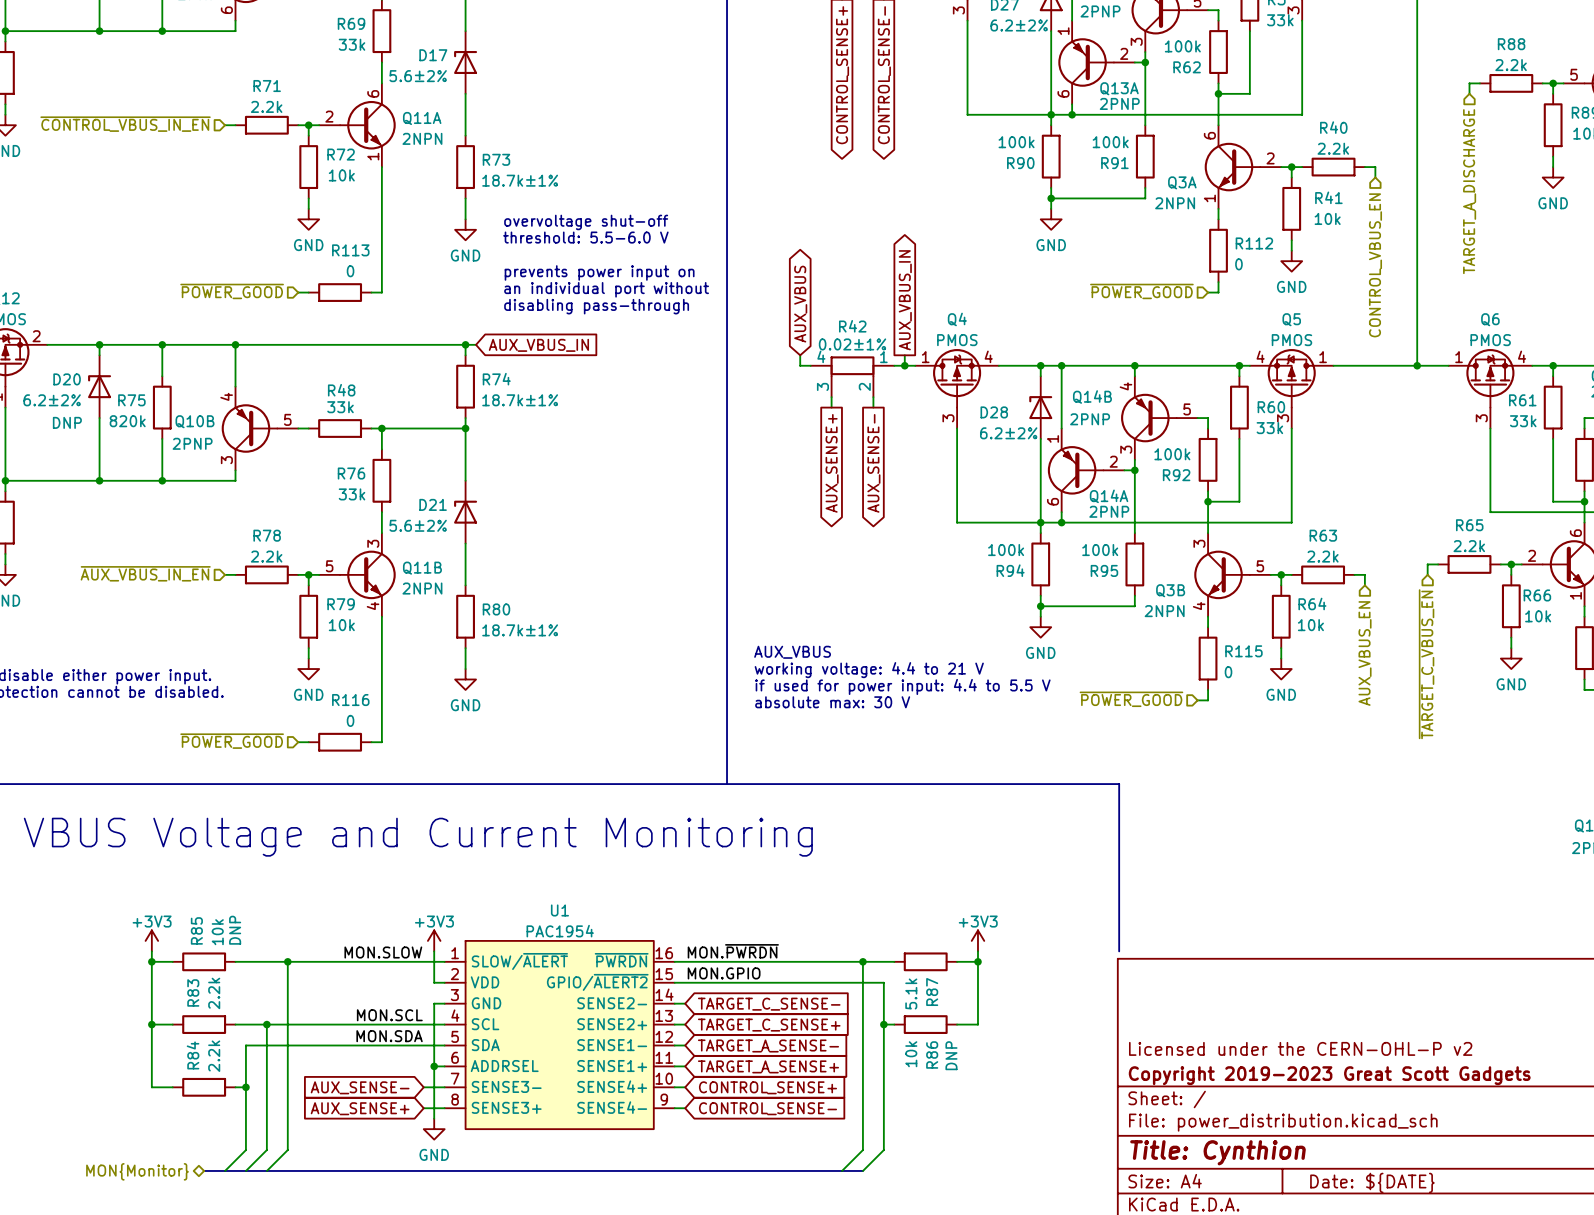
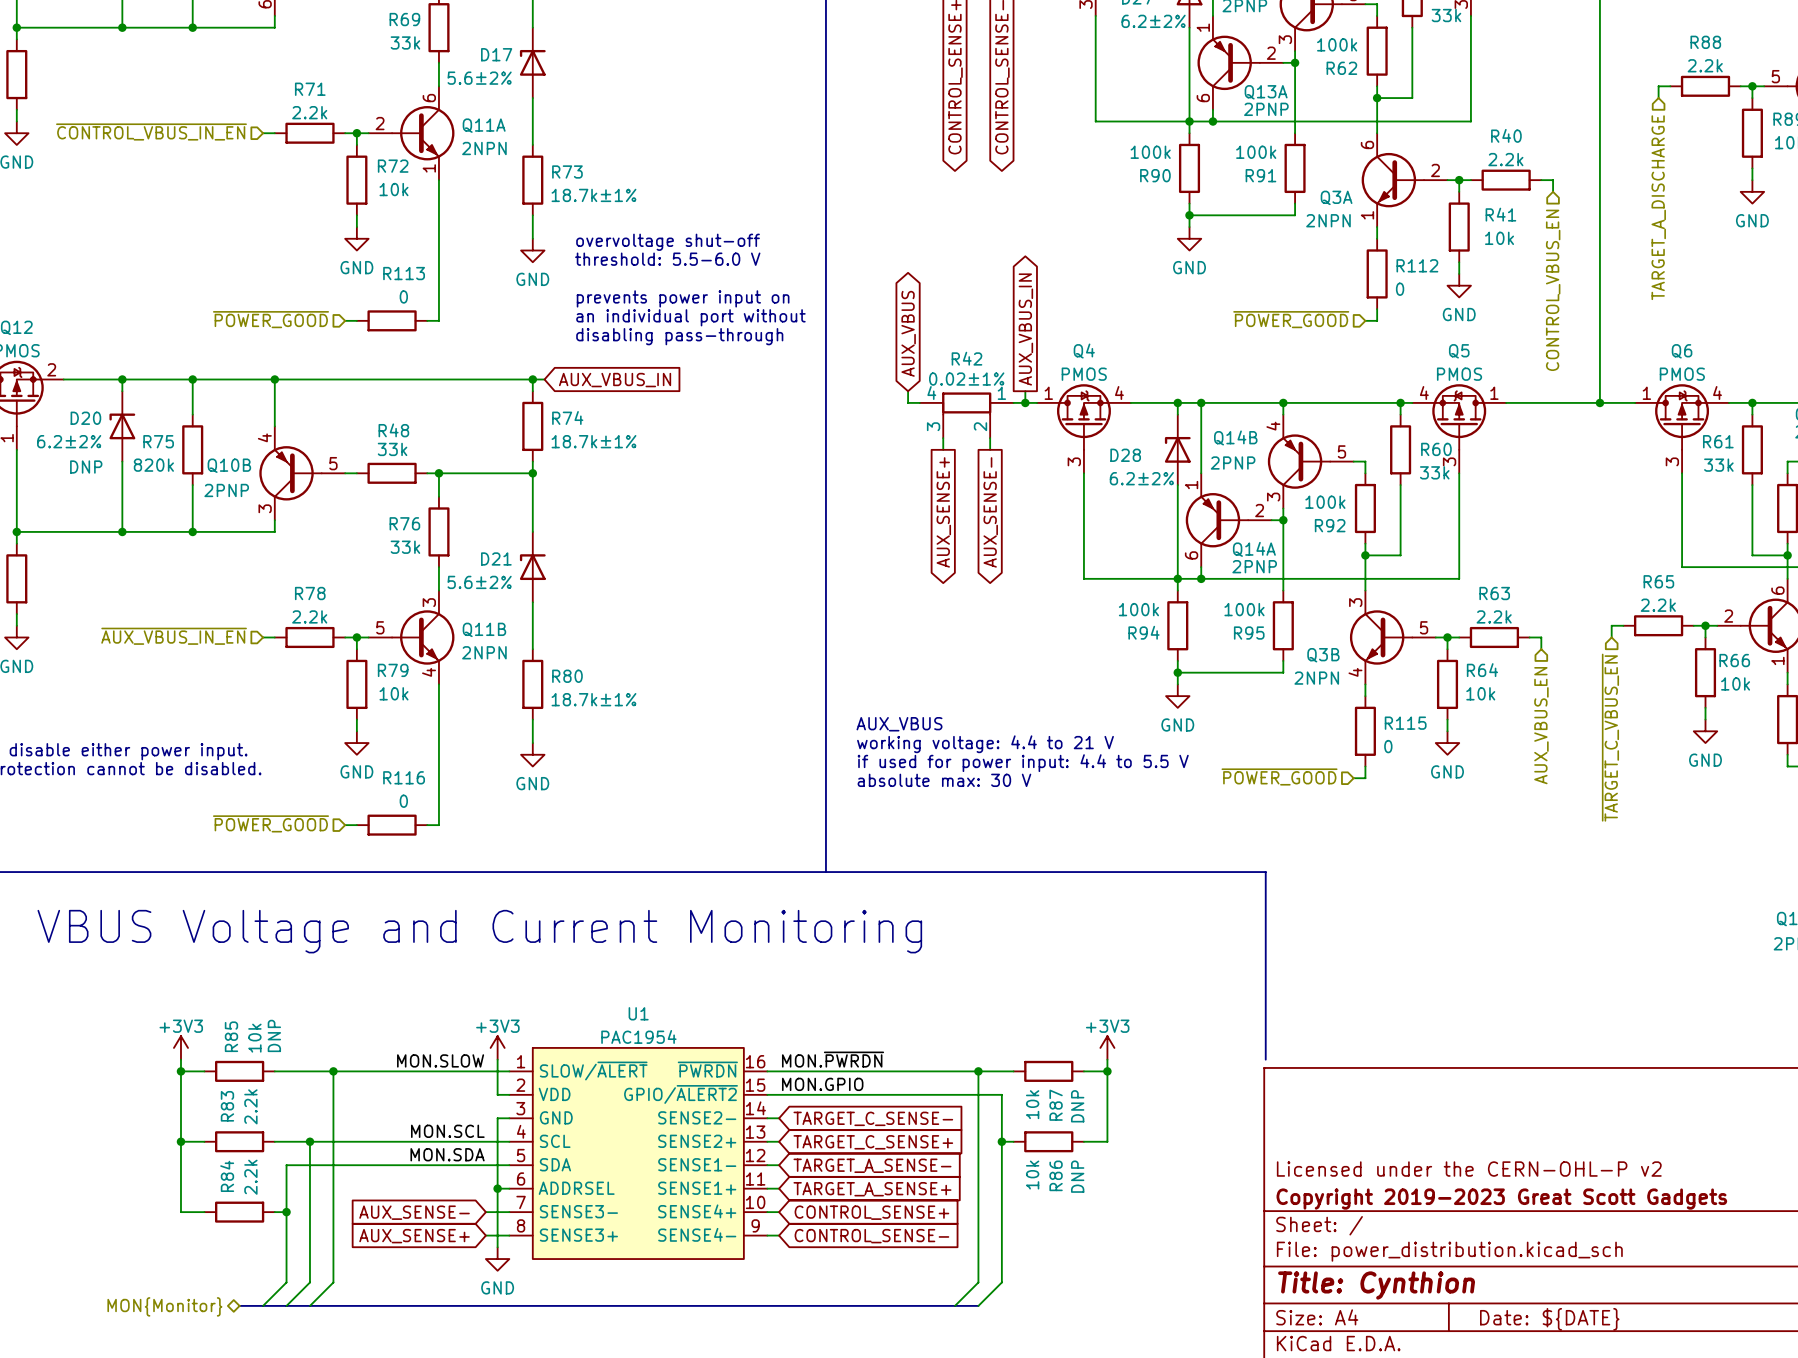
R87 text: none -> DNP (1077, 1106)
R87 value: 5.1k (911, 993) -> 10k (1032, 1104)

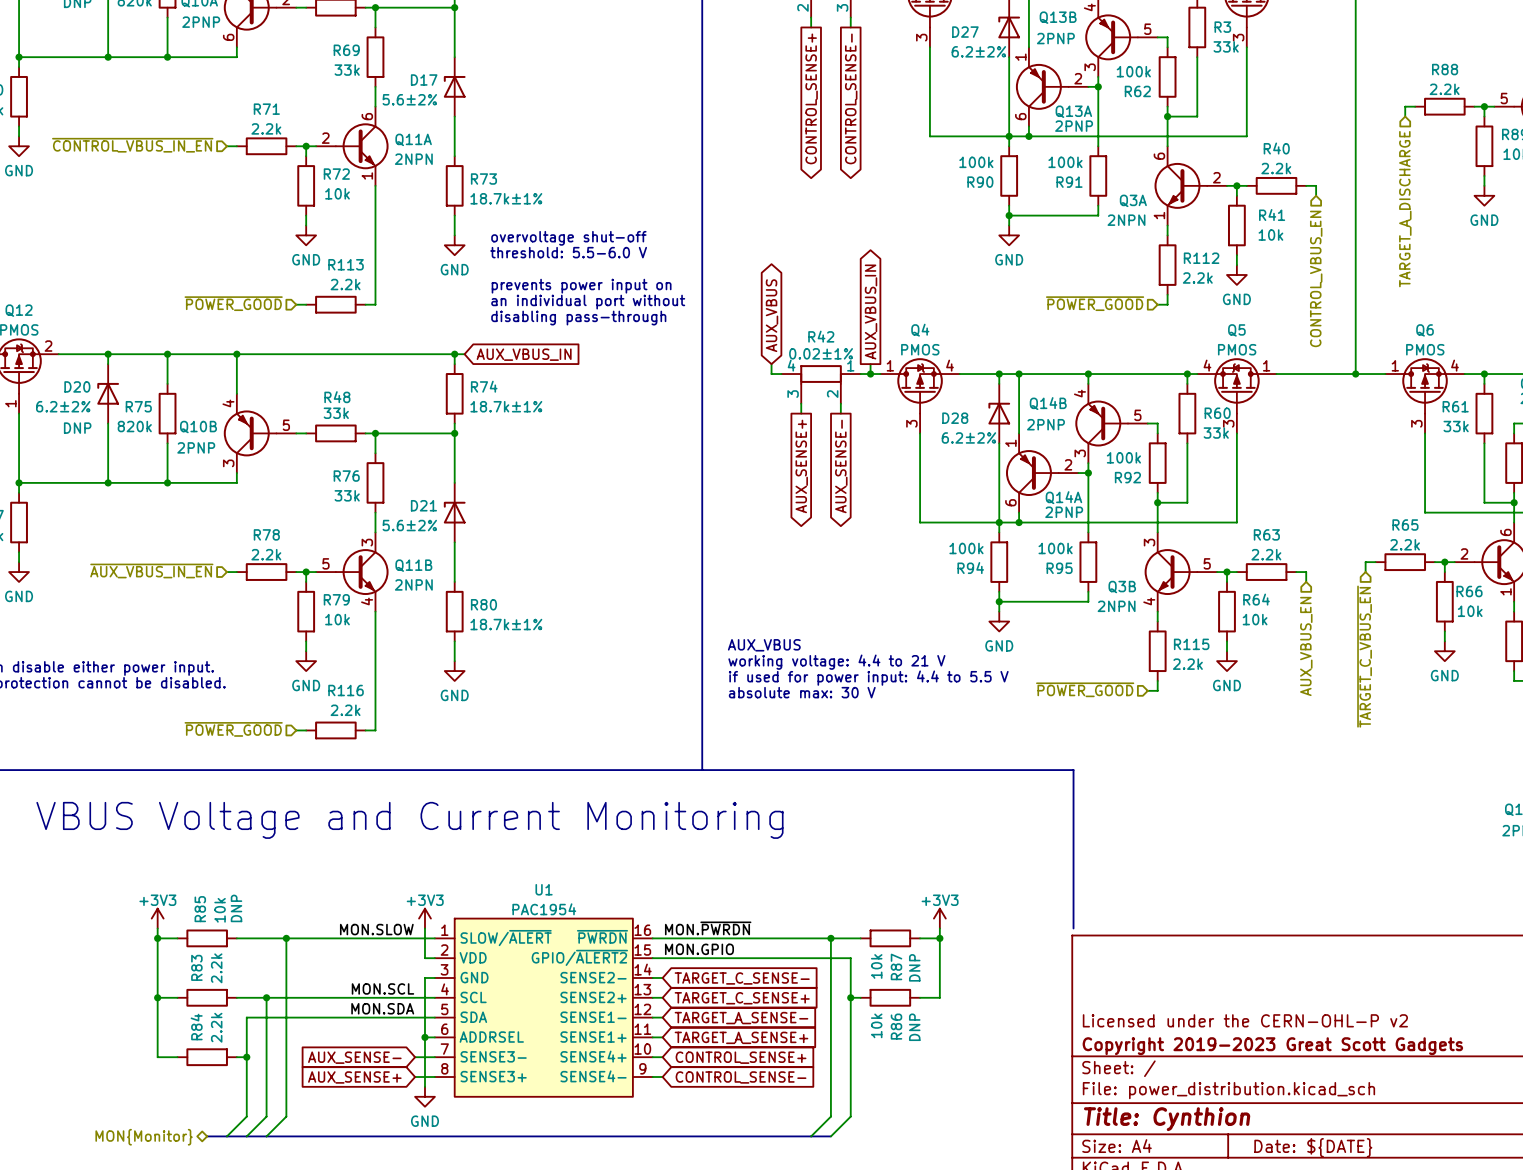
R112 value: 0 (1400, 289) -> 2.2k (1197, 278)
R113 value: 0 (403, 296) -> 2.2k (345, 284)
R115 value: 0 (1388, 746) -> 2.2k (1187, 664)
R116 value: 0 (403, 801) -> 2.2k (345, 710)

